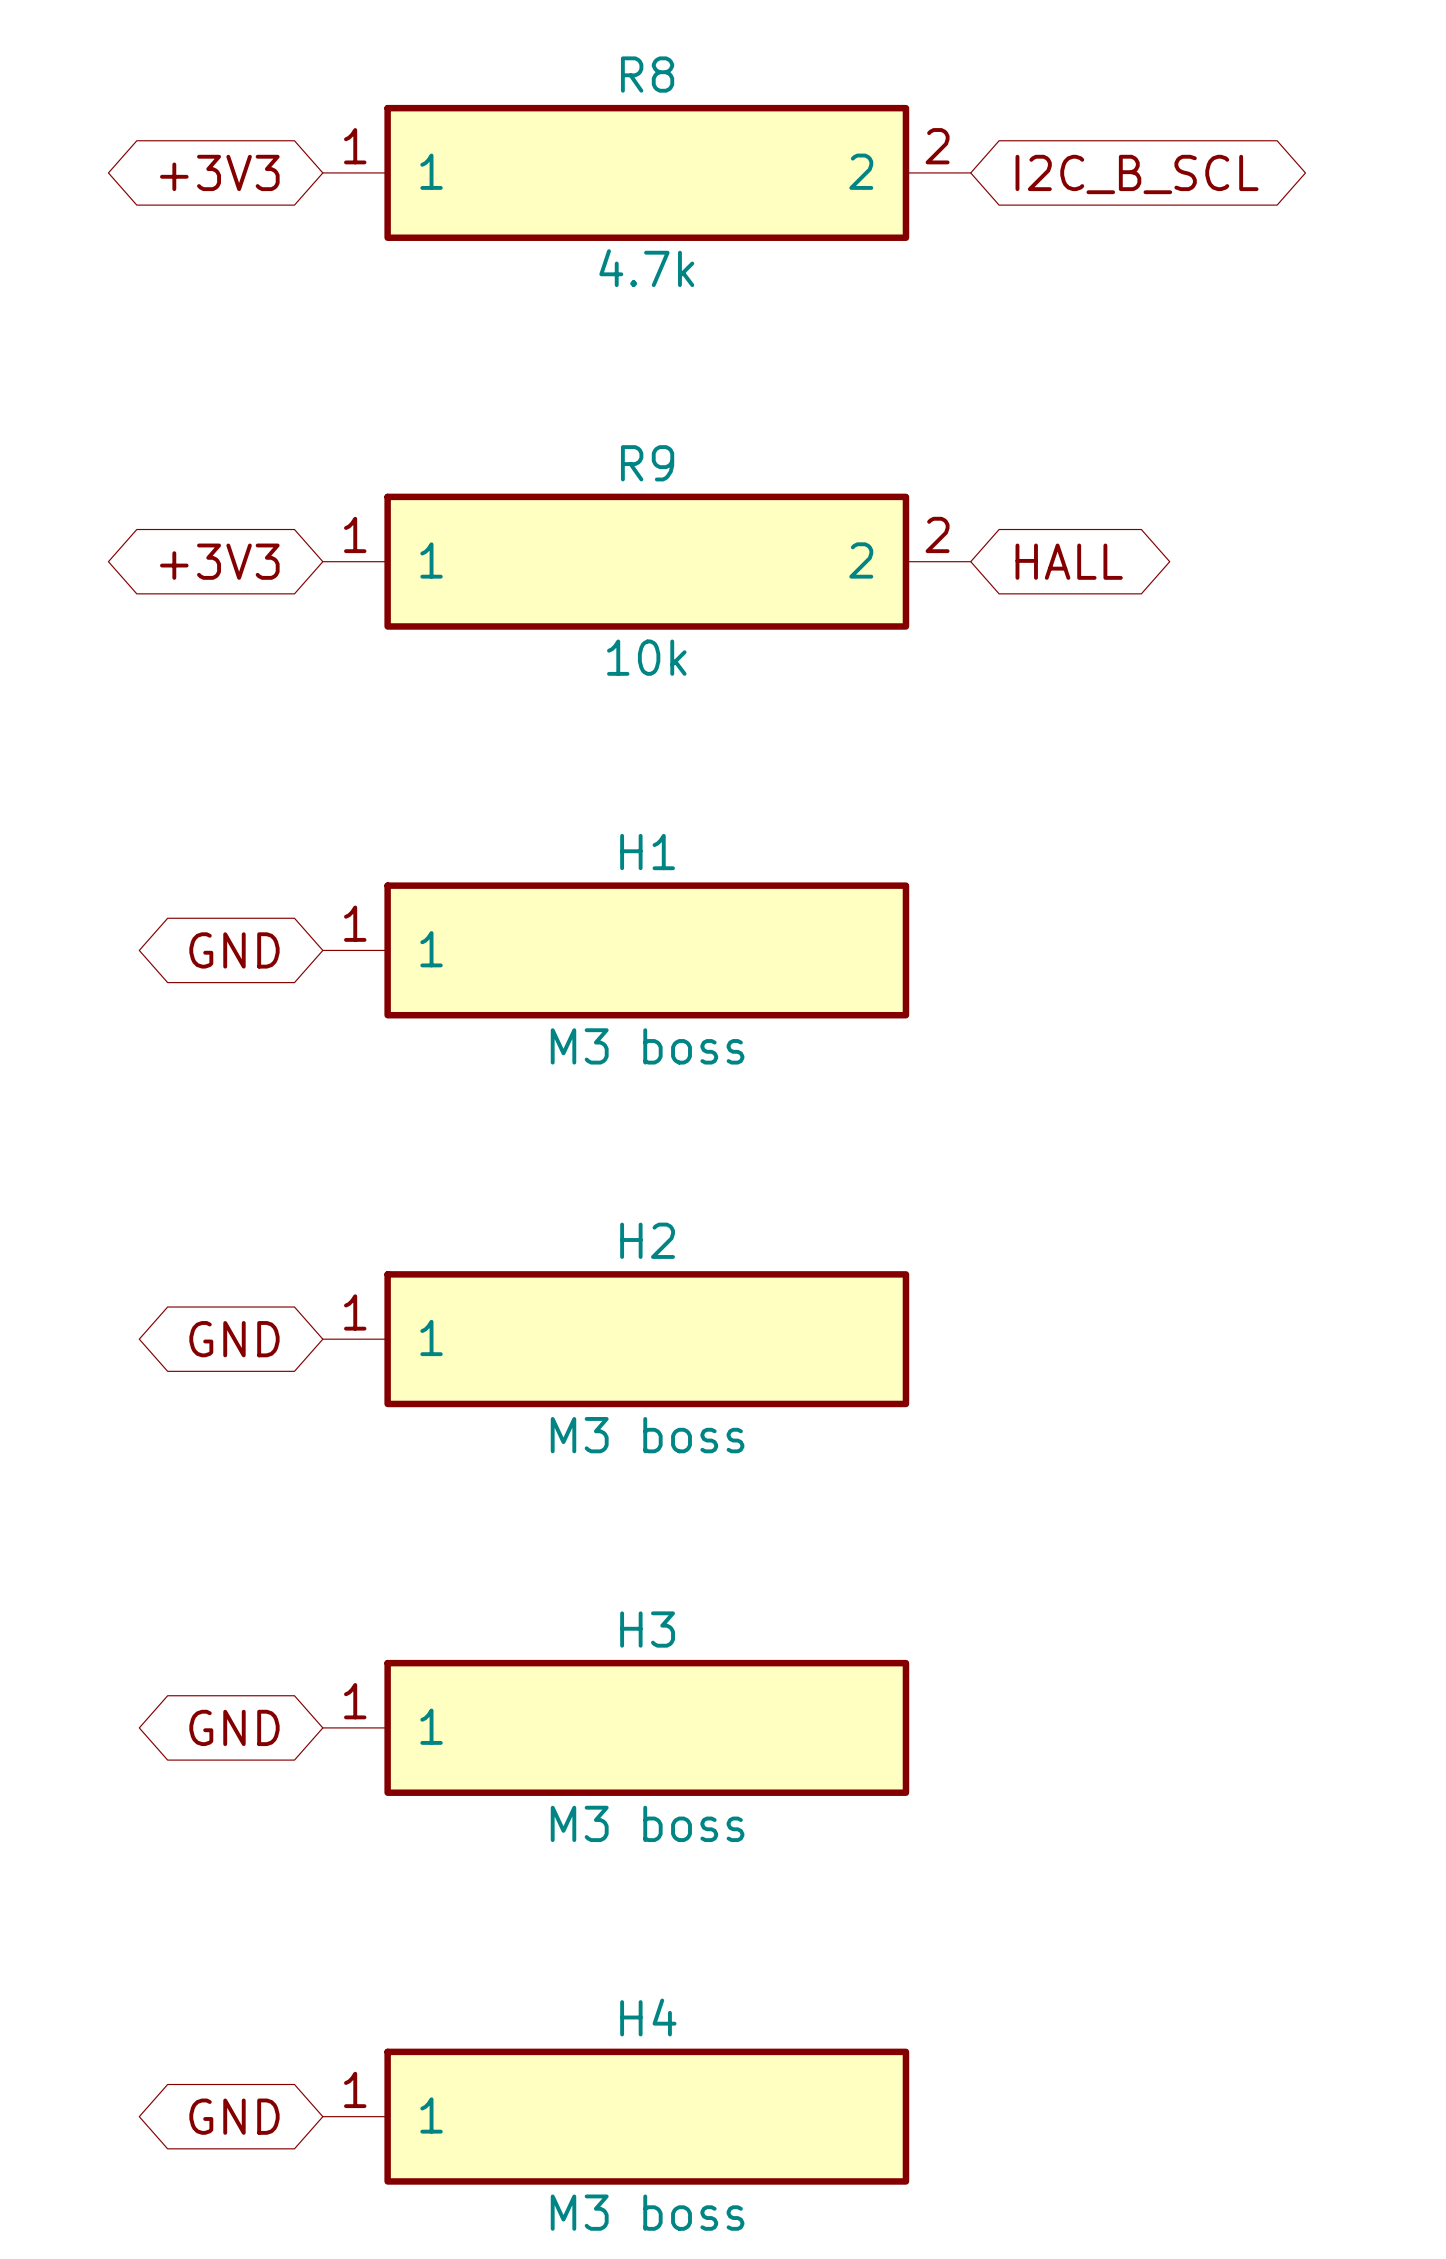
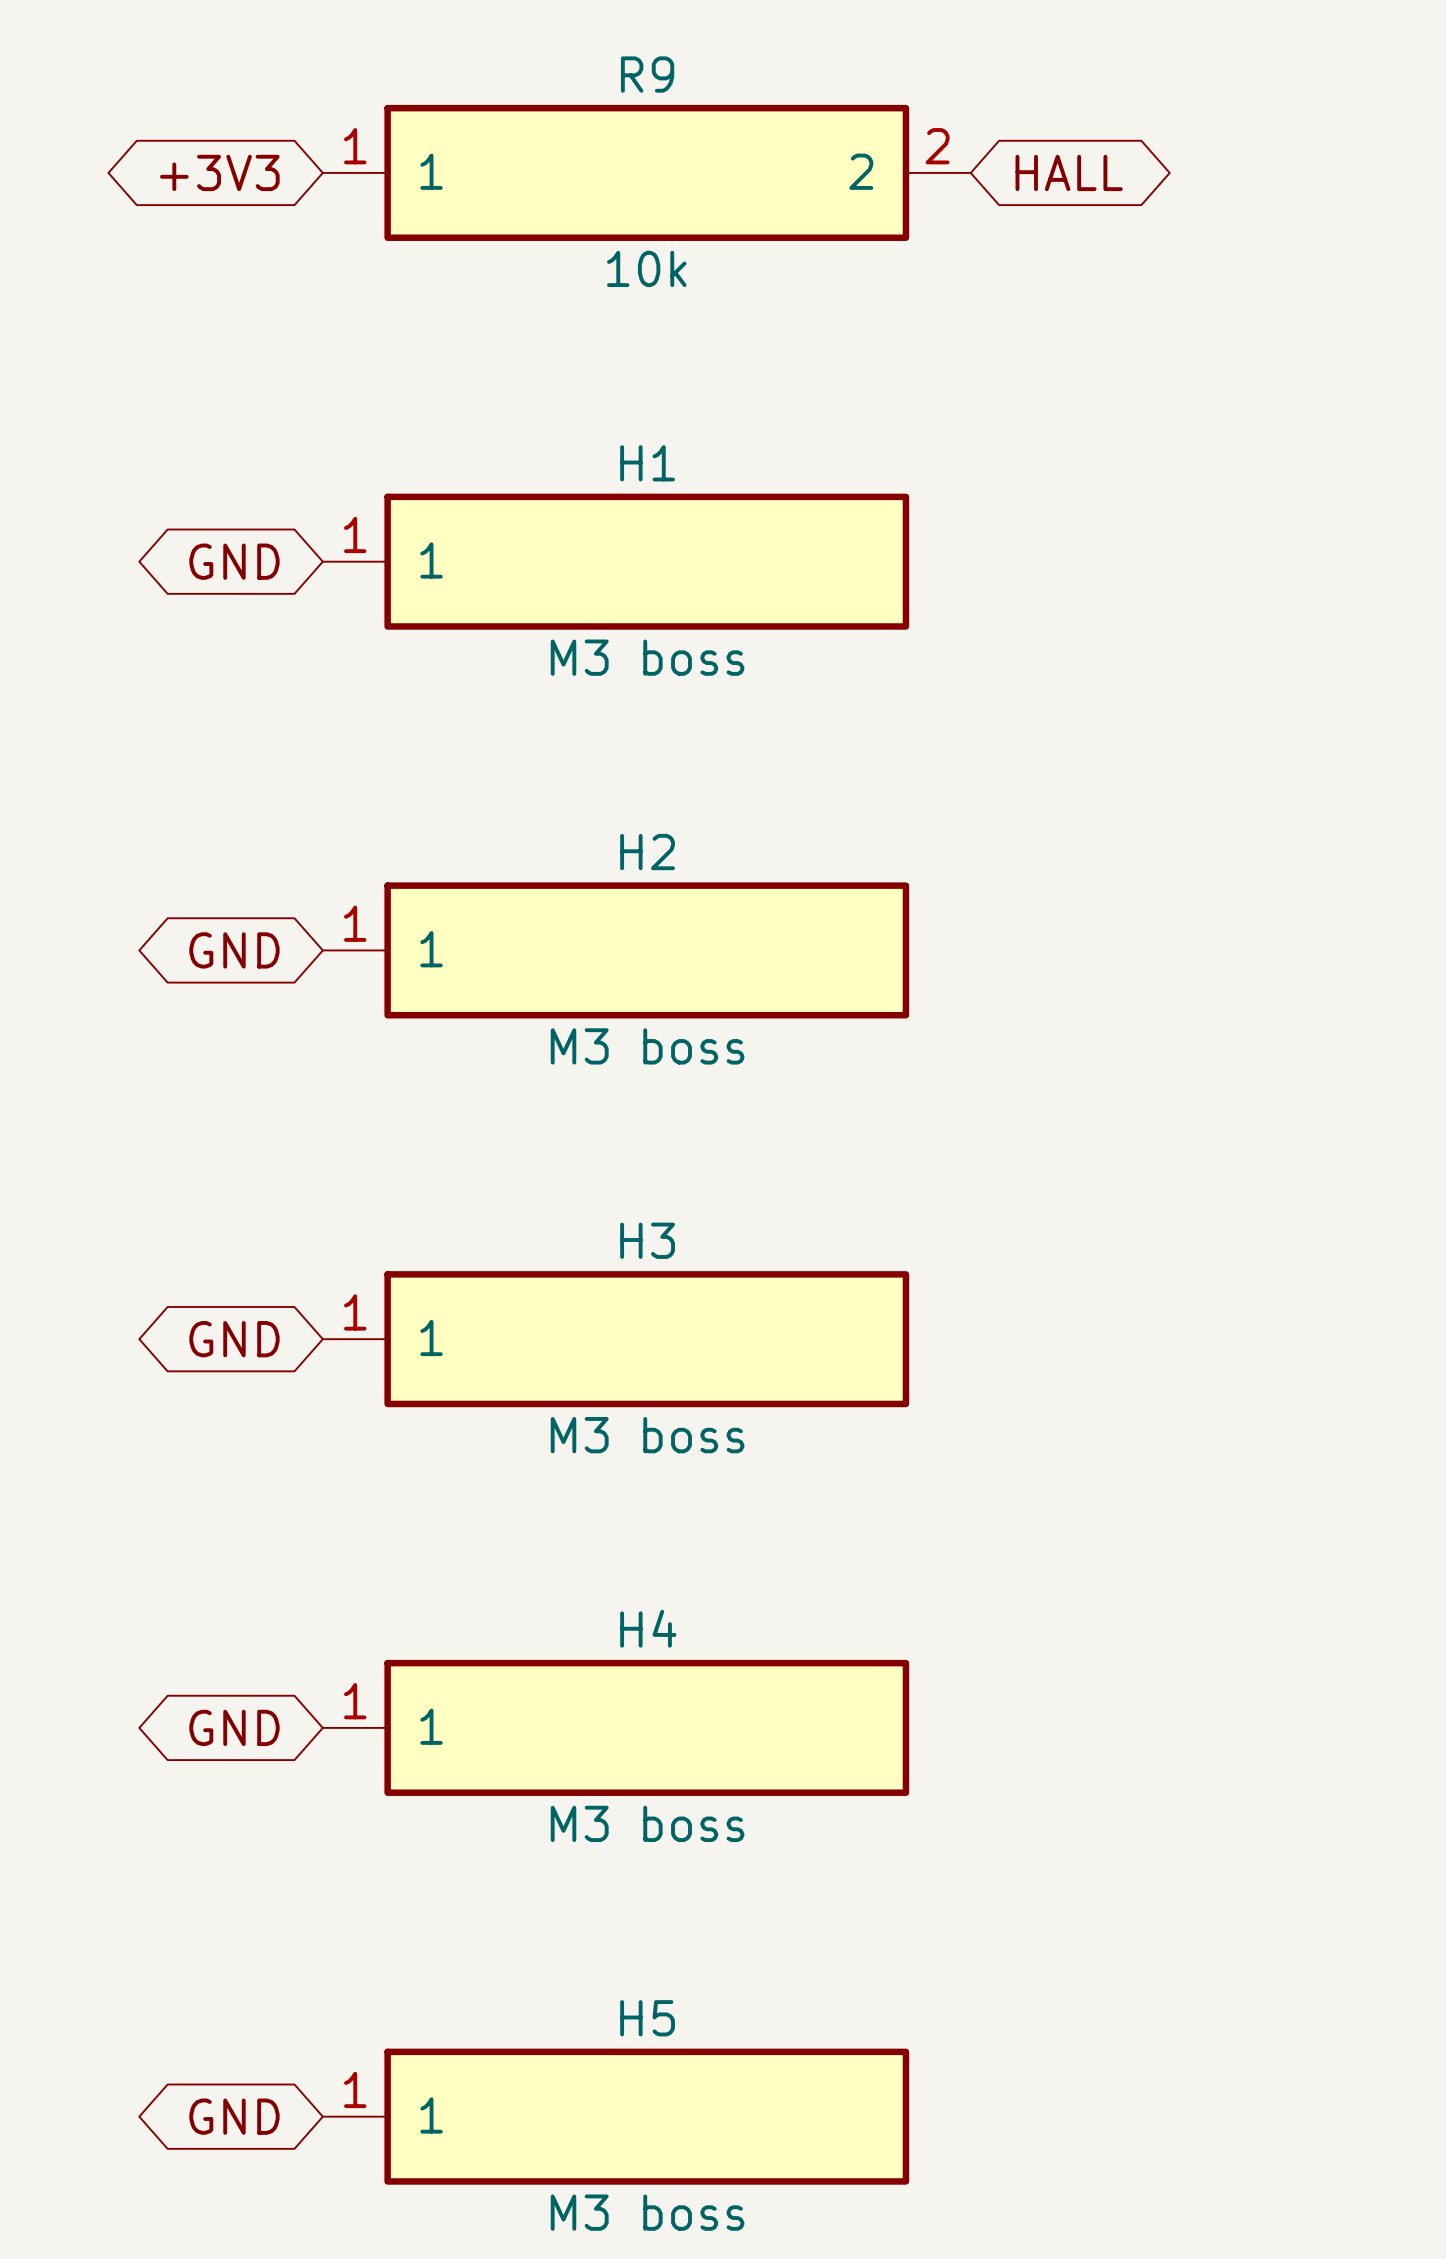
R8 name: R8 (647, 74) -> R9 (647, 74)
global label: I2C_B_SCL (1137, 174) -> HALL (1069, 172)
R8 value: 4.7k (646, 268) -> 10k (646, 268)
global label: +3V3 (219, 561) -> GND (234, 561)
H1: none -> M3 boss (616, 561)
R9: 10k (646, 561) -> none
global label: HALL (1069, 561) -> none
H1 name: H1 (647, 852) -> H2 (647, 852)
H2 name: H2 (647, 1240) -> H3 (647, 1240)
H3 name: H3 (647, 1629) -> H4 (648, 1628)
H4 name: H4 (648, 2017) -> H5 (647, 2018)

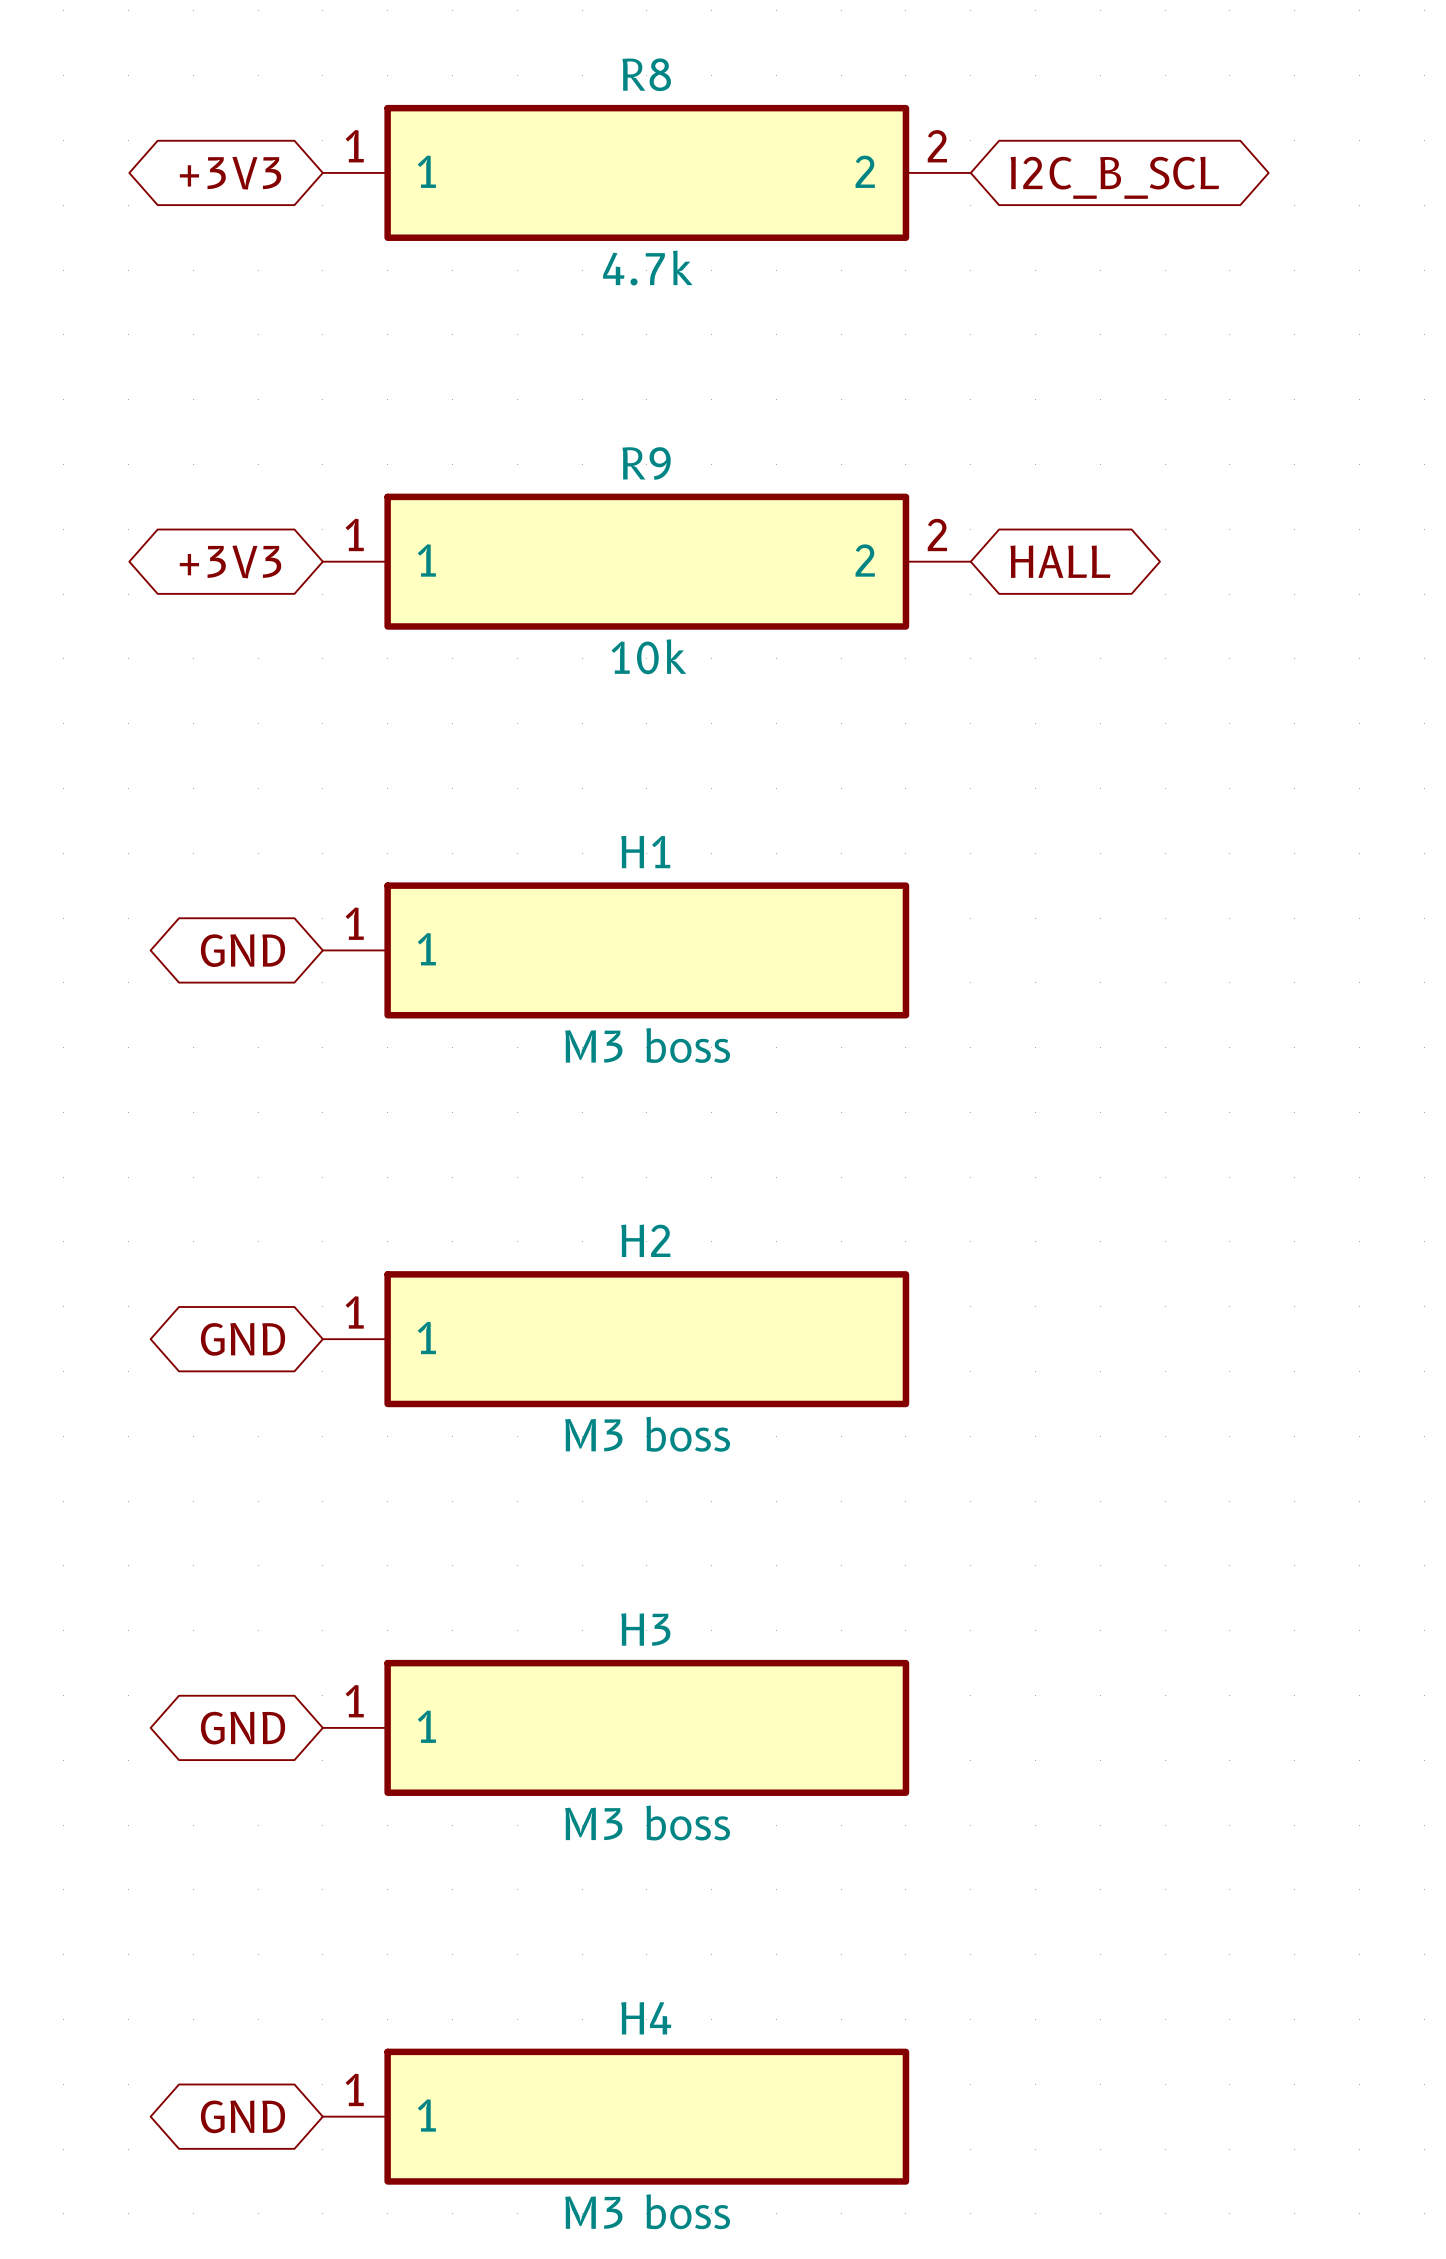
R9 name: R9 (647, 74) -> R8 (646, 74)
global label: HALL (1069, 172) -> I2C_B_SCL (1114, 177)
R9 value: 10k (646, 268) -> 4.7k (647, 268)
global label: GND (234, 561) -> +3V3 (230, 561)
H1: M3 boss (616, 561) -> none
R9: none -> 10k (646, 561)
global label: none -> HALL (1060, 561)
H2 name: H2 (647, 852) -> H1 (645, 852)
H3 name: H3 (647, 1240) -> H2 (645, 1240)
H4 name: H4 (648, 1628) -> H3 (645, 1629)
H5 name: H5 (647, 2018) -> H4 (646, 2018)

